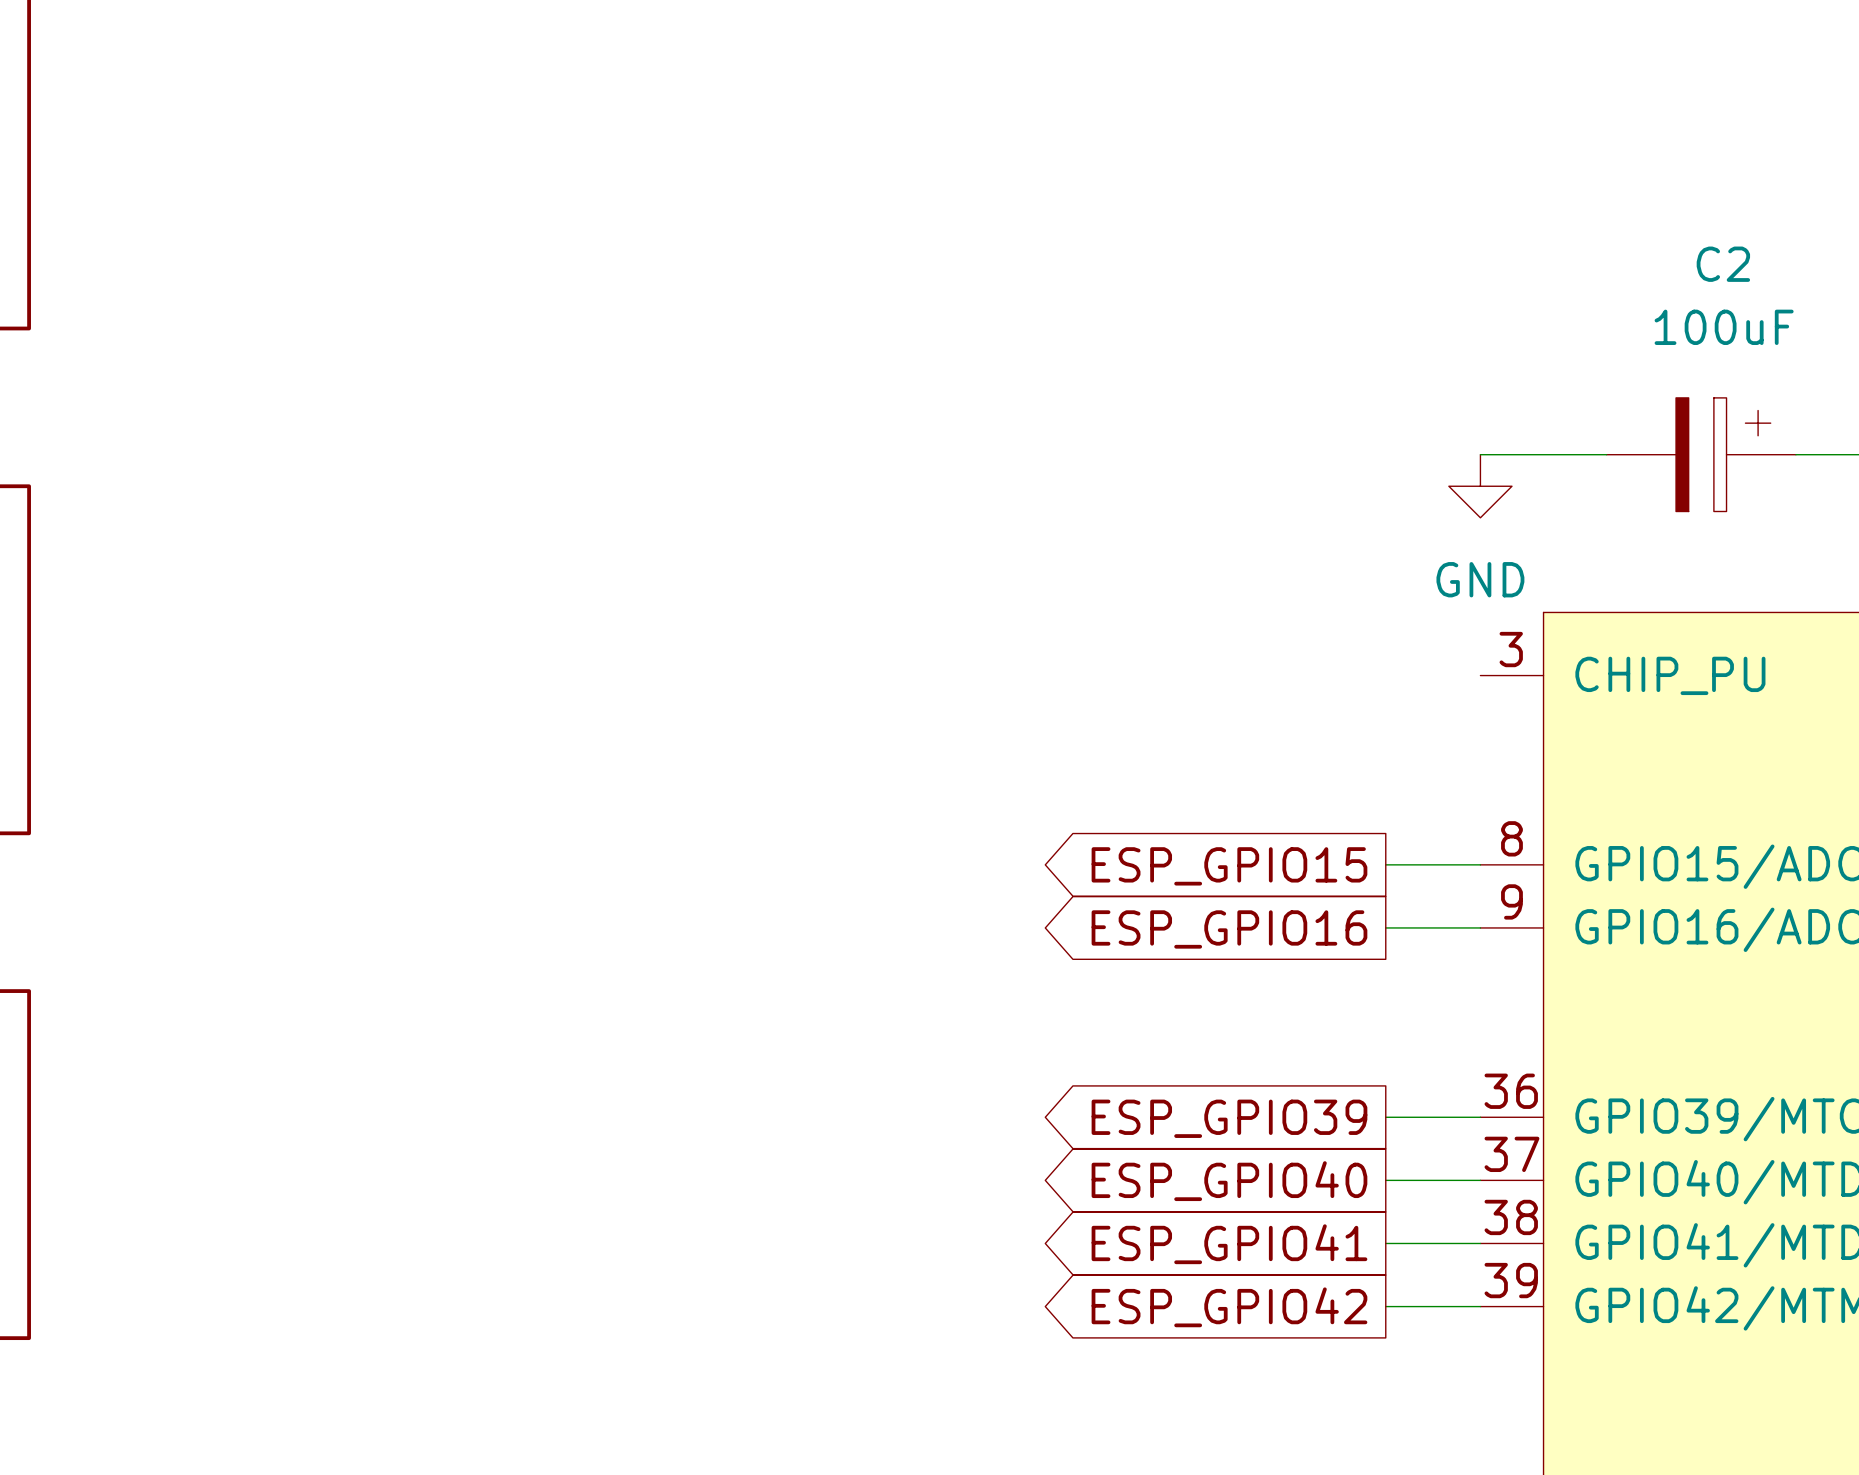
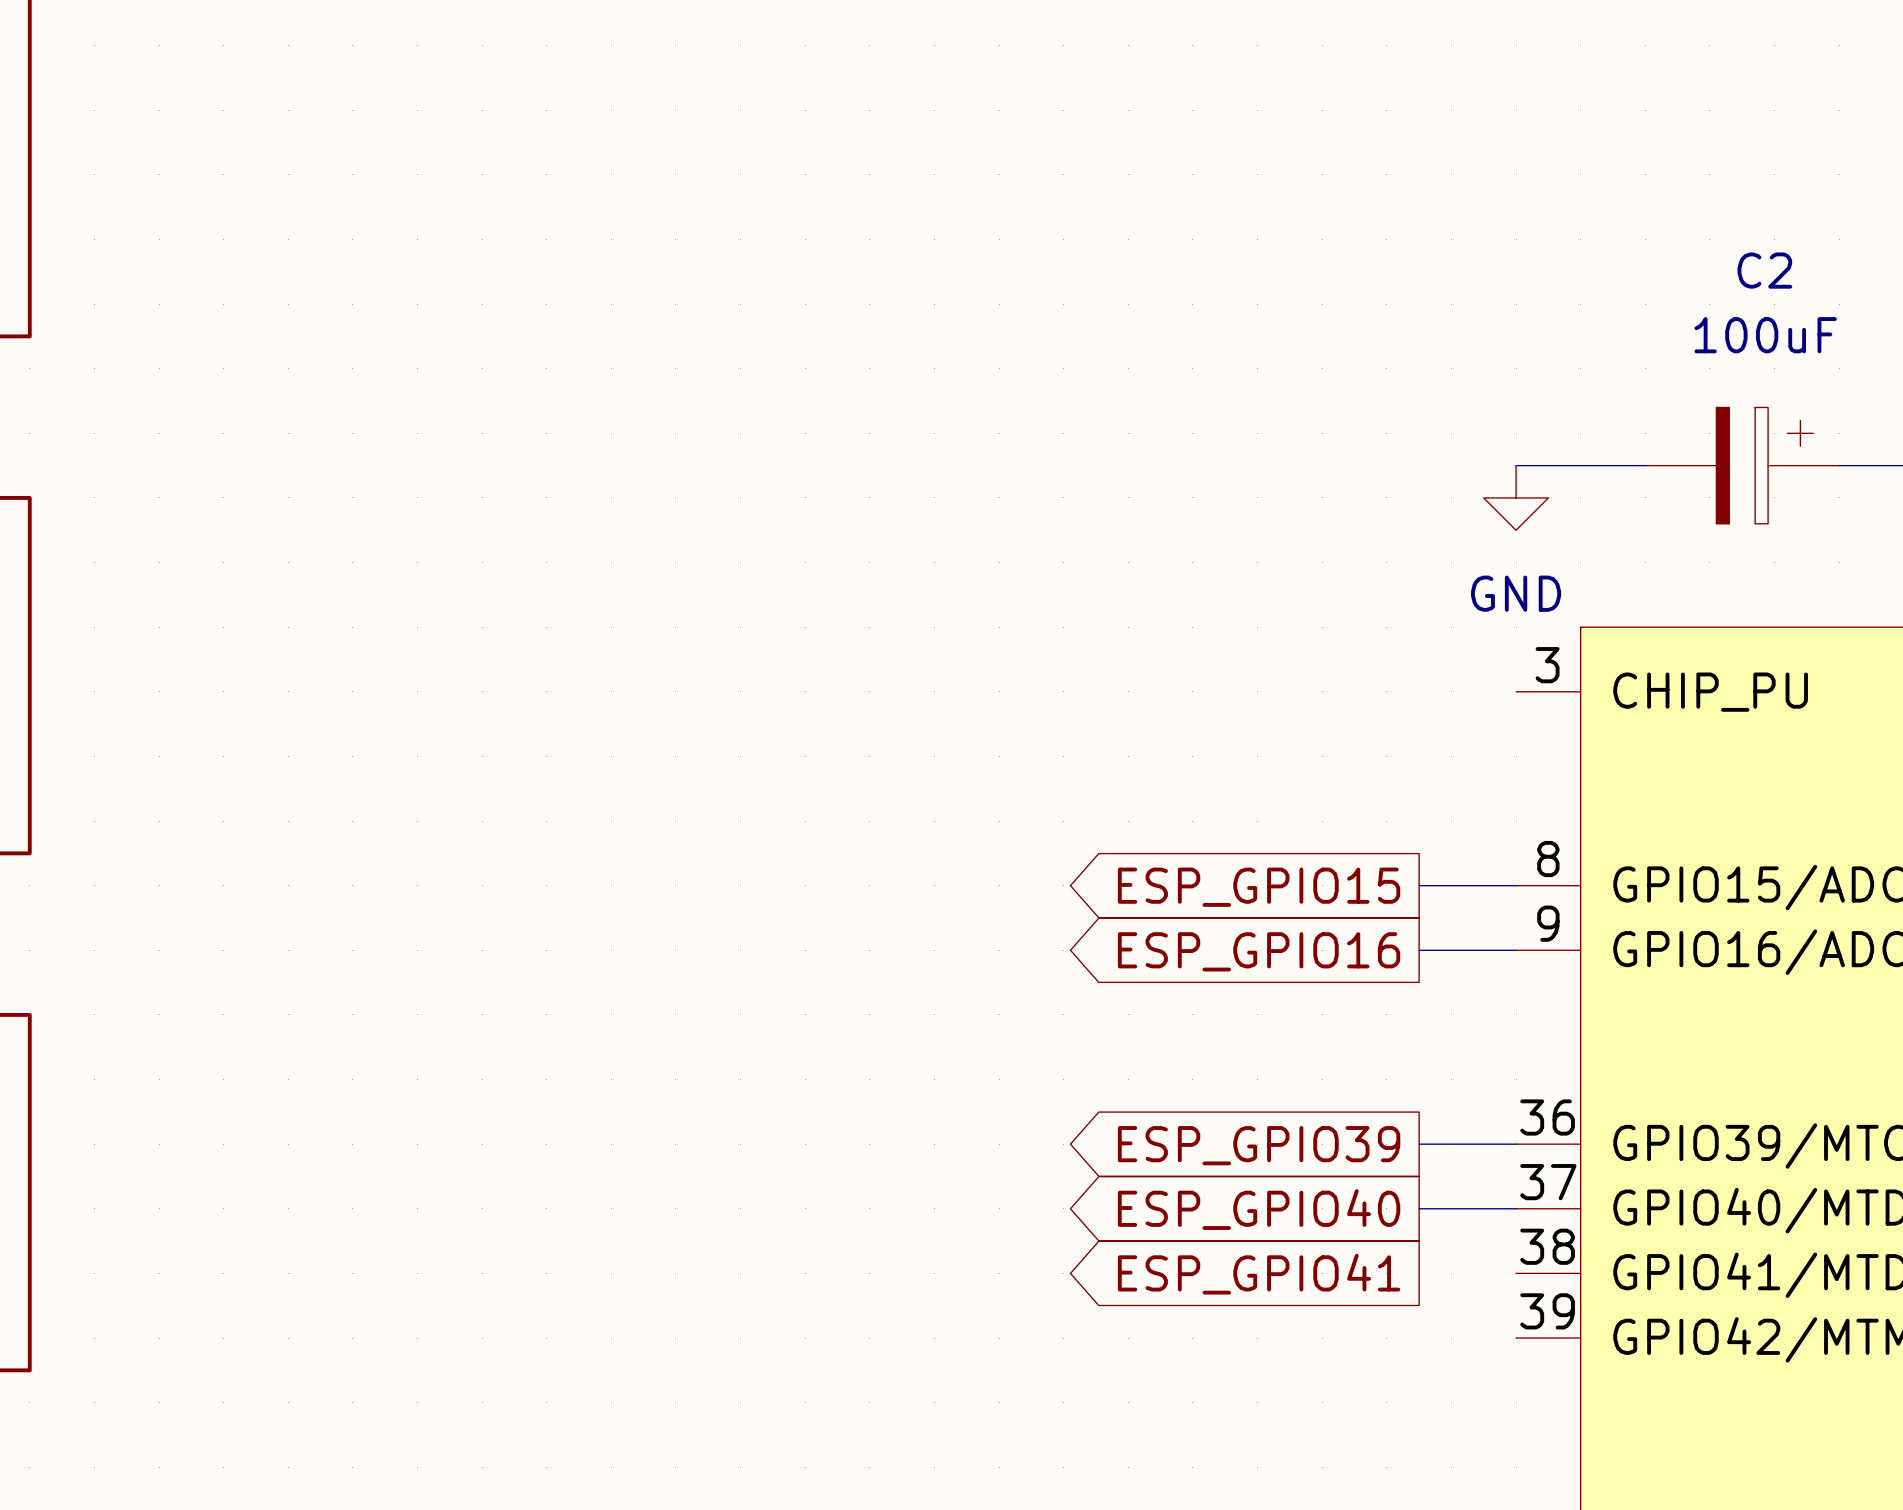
wire: (1385, 1243) (1480, 1243) -> none
wire: (1385, 1306) (1480, 1306) -> none
global label: ESP_GPIO42 (1229, 1307) -> none

